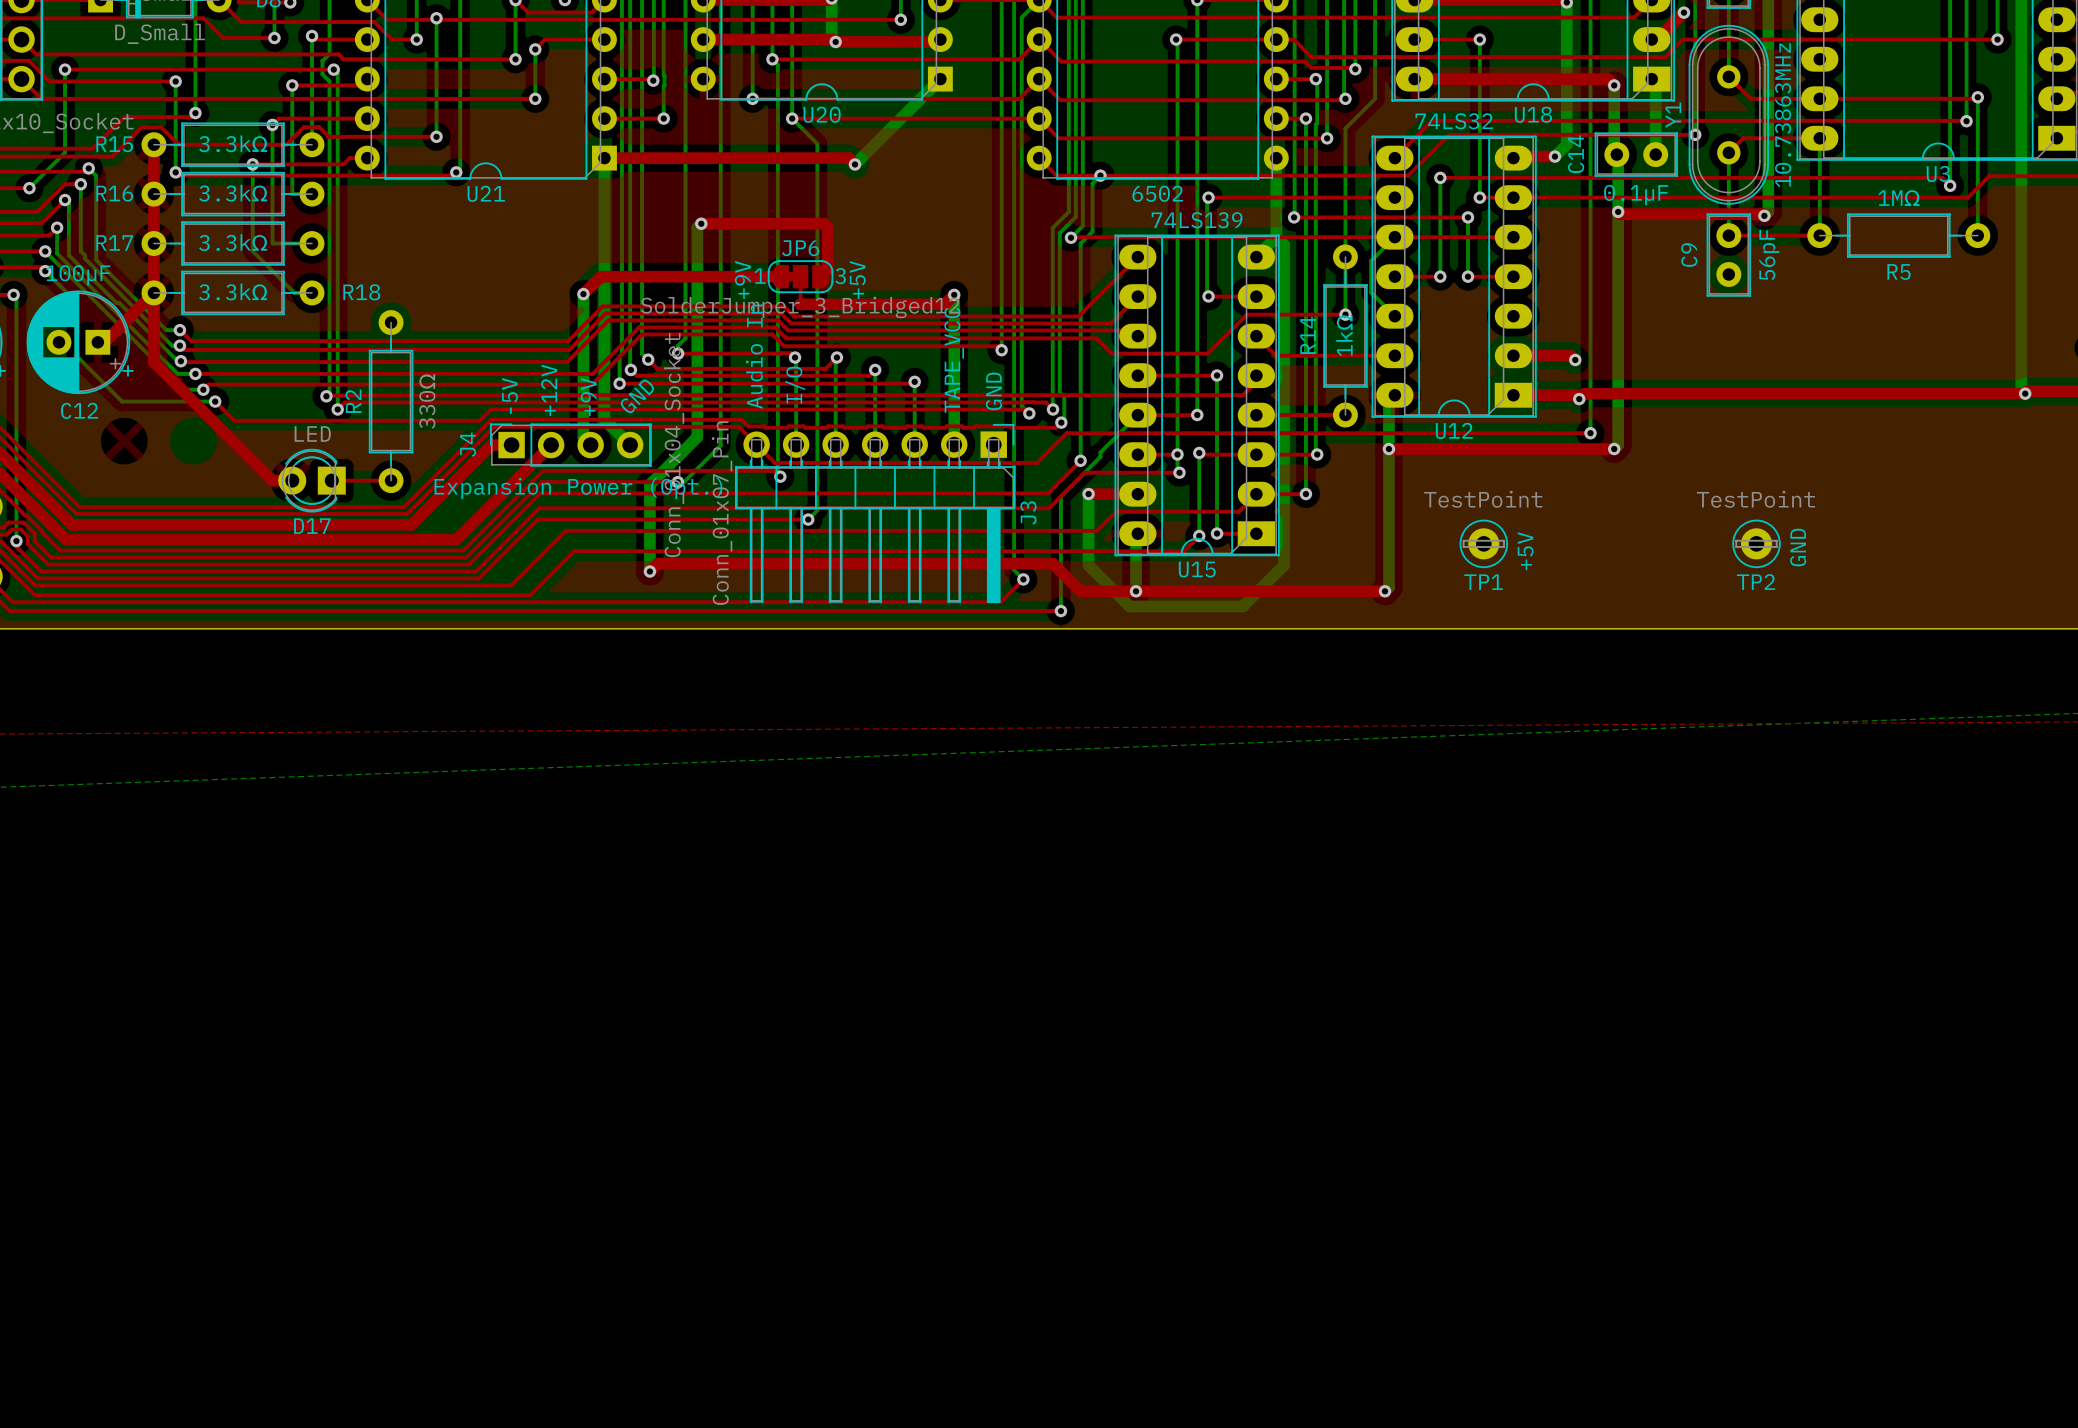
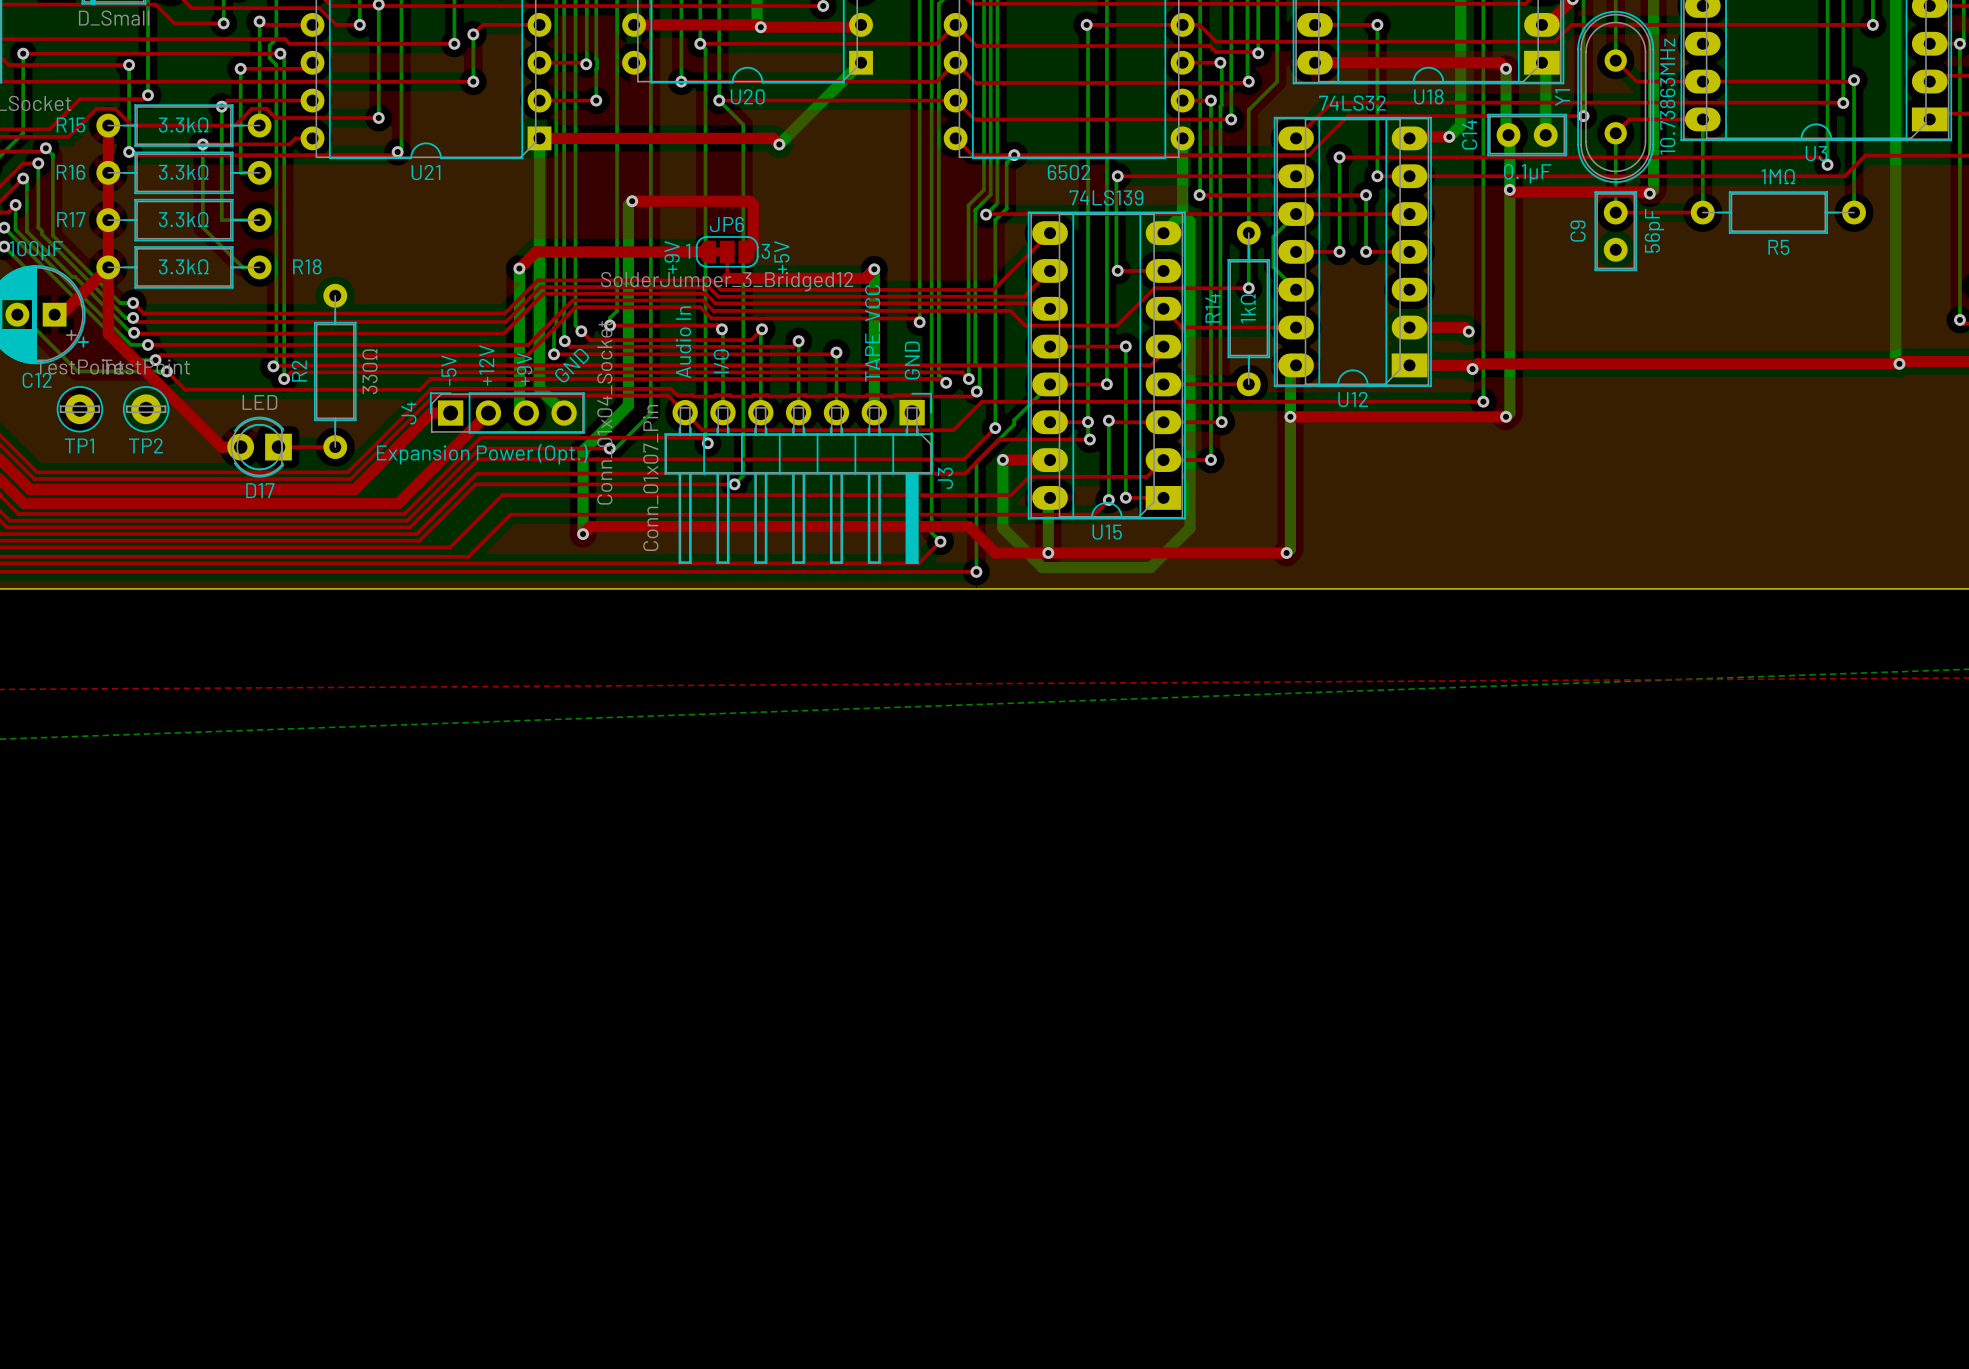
TP1 position: (1483, 543) -> (79, 409)
TP2 position: (1756, 543) -> (146, 409)
text: GND (1798, 547) -> none
text: +5V (1525, 551) -> none

